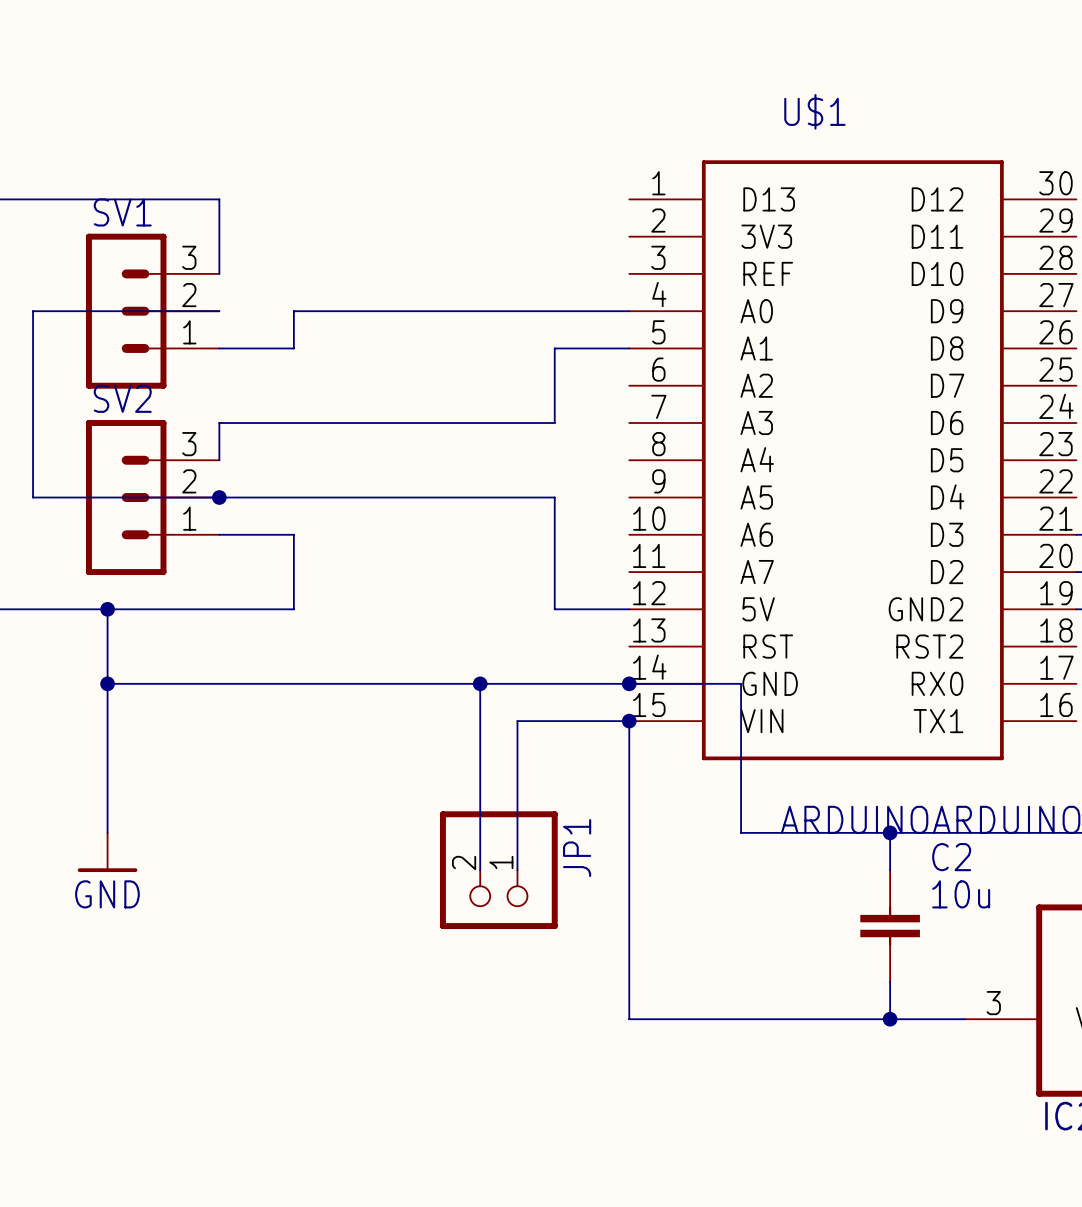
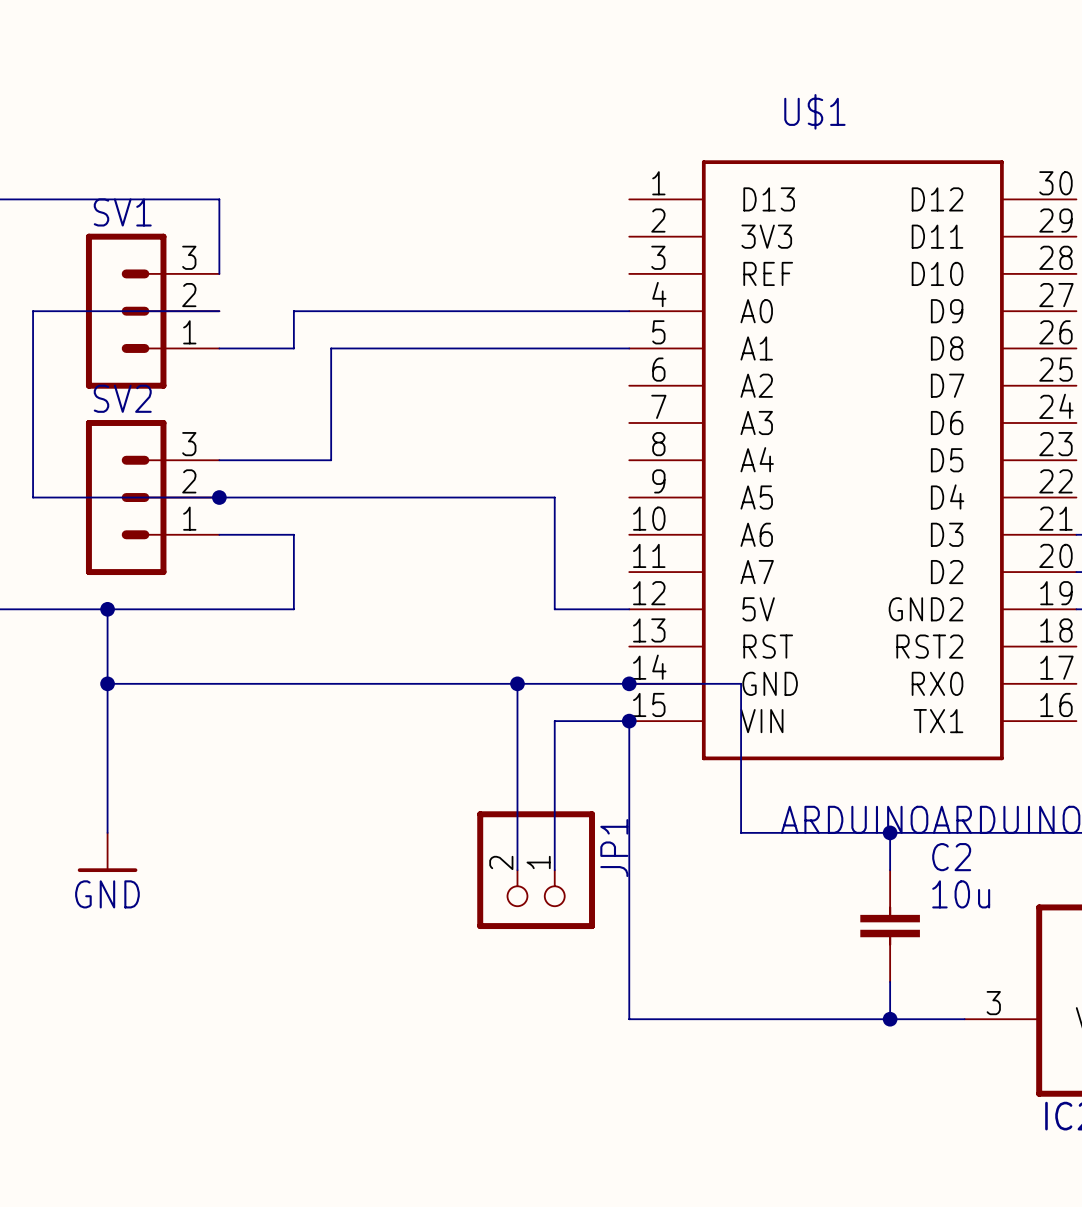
wire: (554, 348) (554, 422) (219, 422) (219, 460) -> (554, 348) (331, 348) (331, 460) (219, 460)
wire: (480, 683) (480, 870) -> none
junction position: (480, 683) -> (517, 683)
wire: (517, 721) (554, 721) -> (517, 721) (517, 683)
wire: none -> (554, 721) (554, 870)
JP1 position: (498, 870) -> (536, 870)

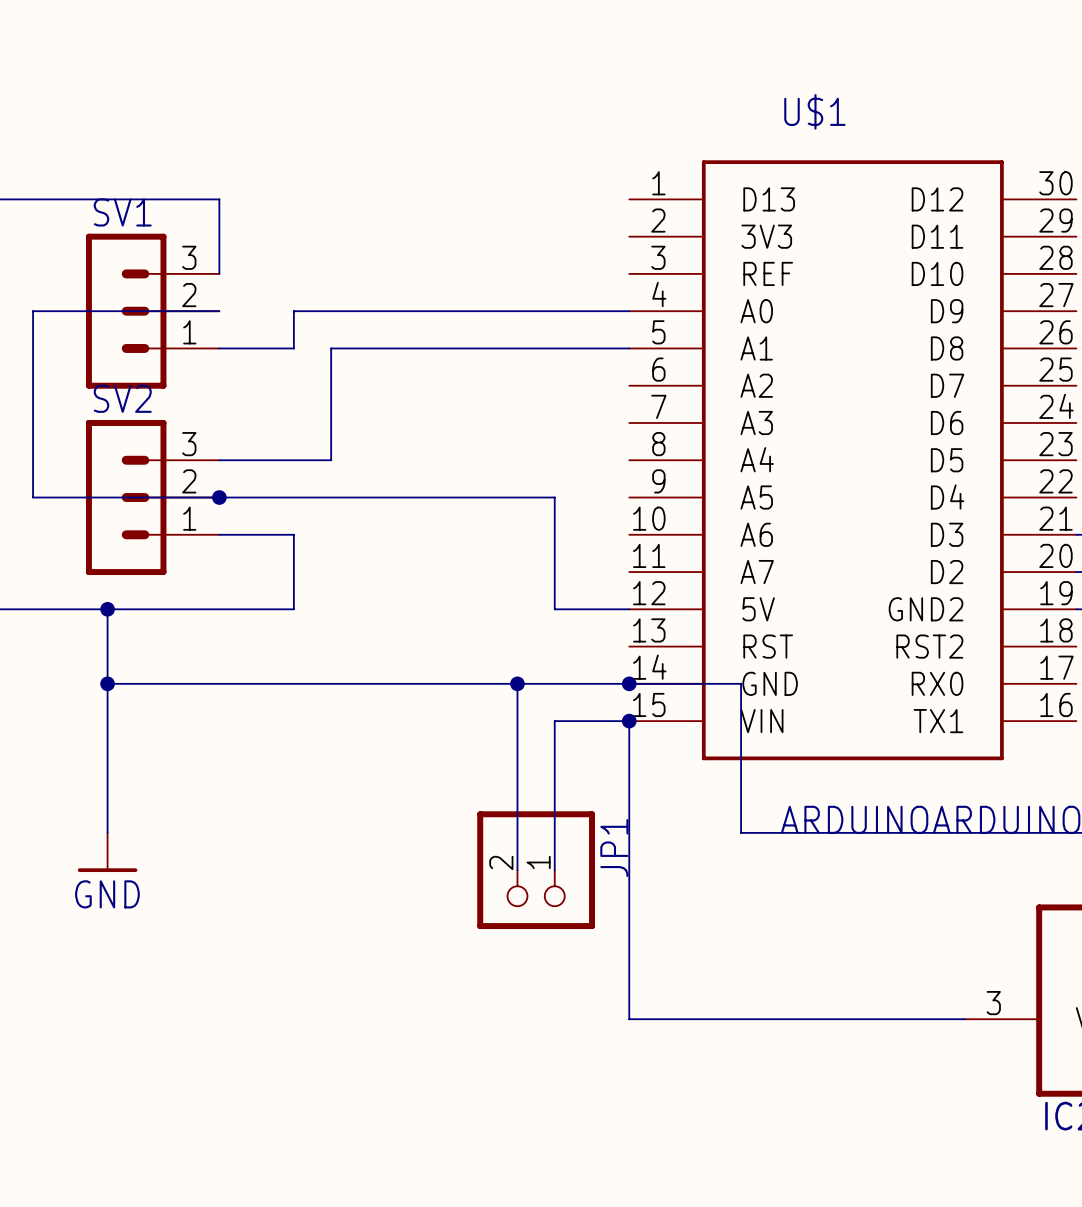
wire: (890, 832) (890, 870) -> none
junction: (890, 832) -> none
C2: 10u (890, 926) -> none
wire: (890, 981) (890, 1019) -> none
junction: (890, 1019) -> none

